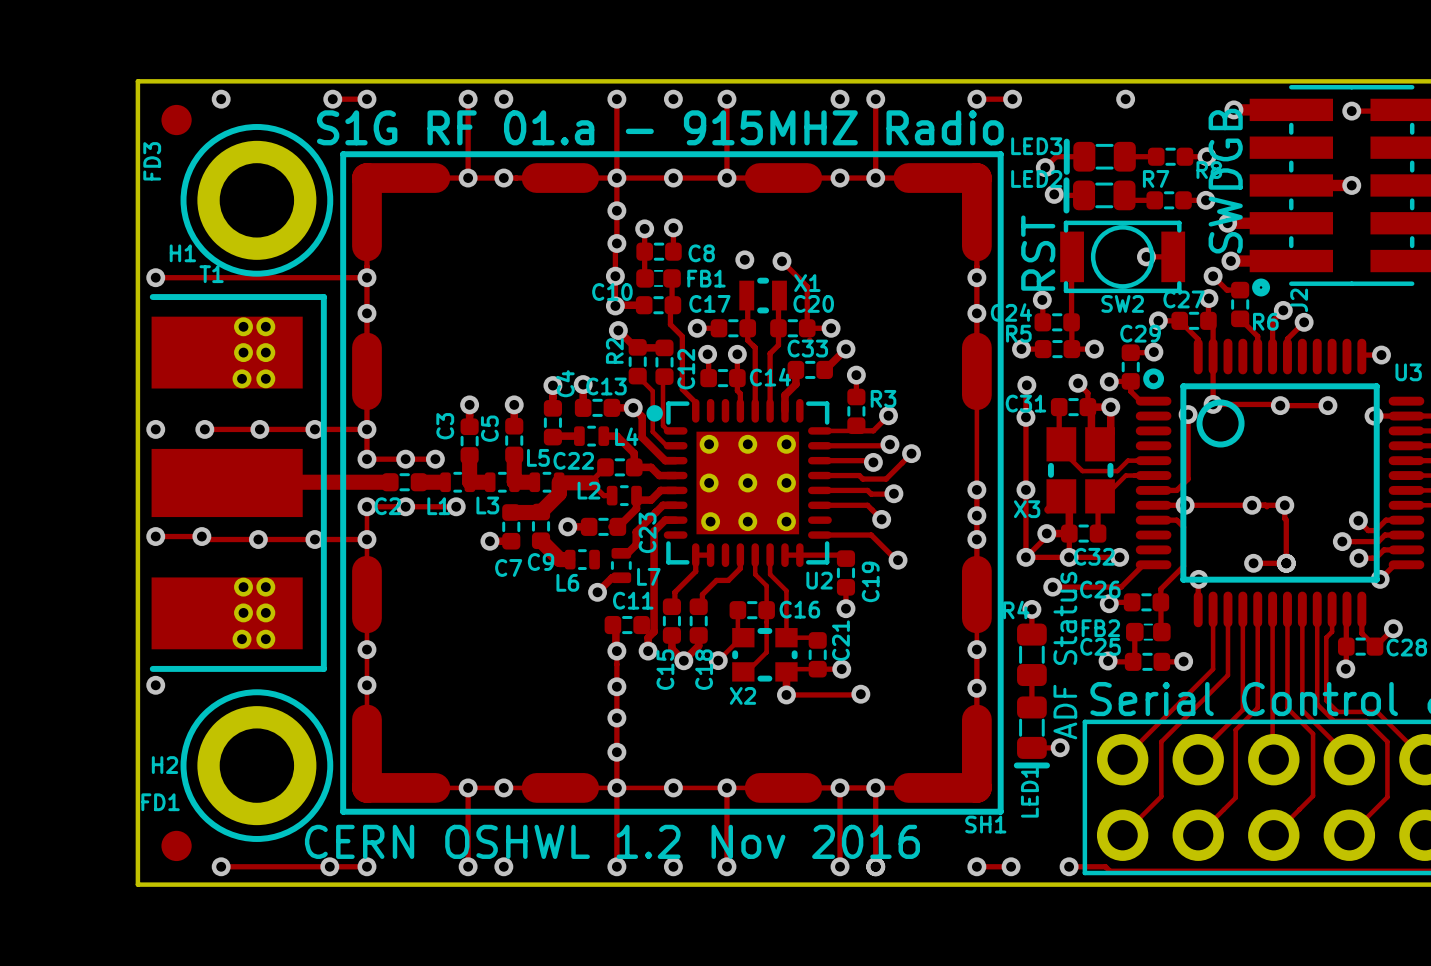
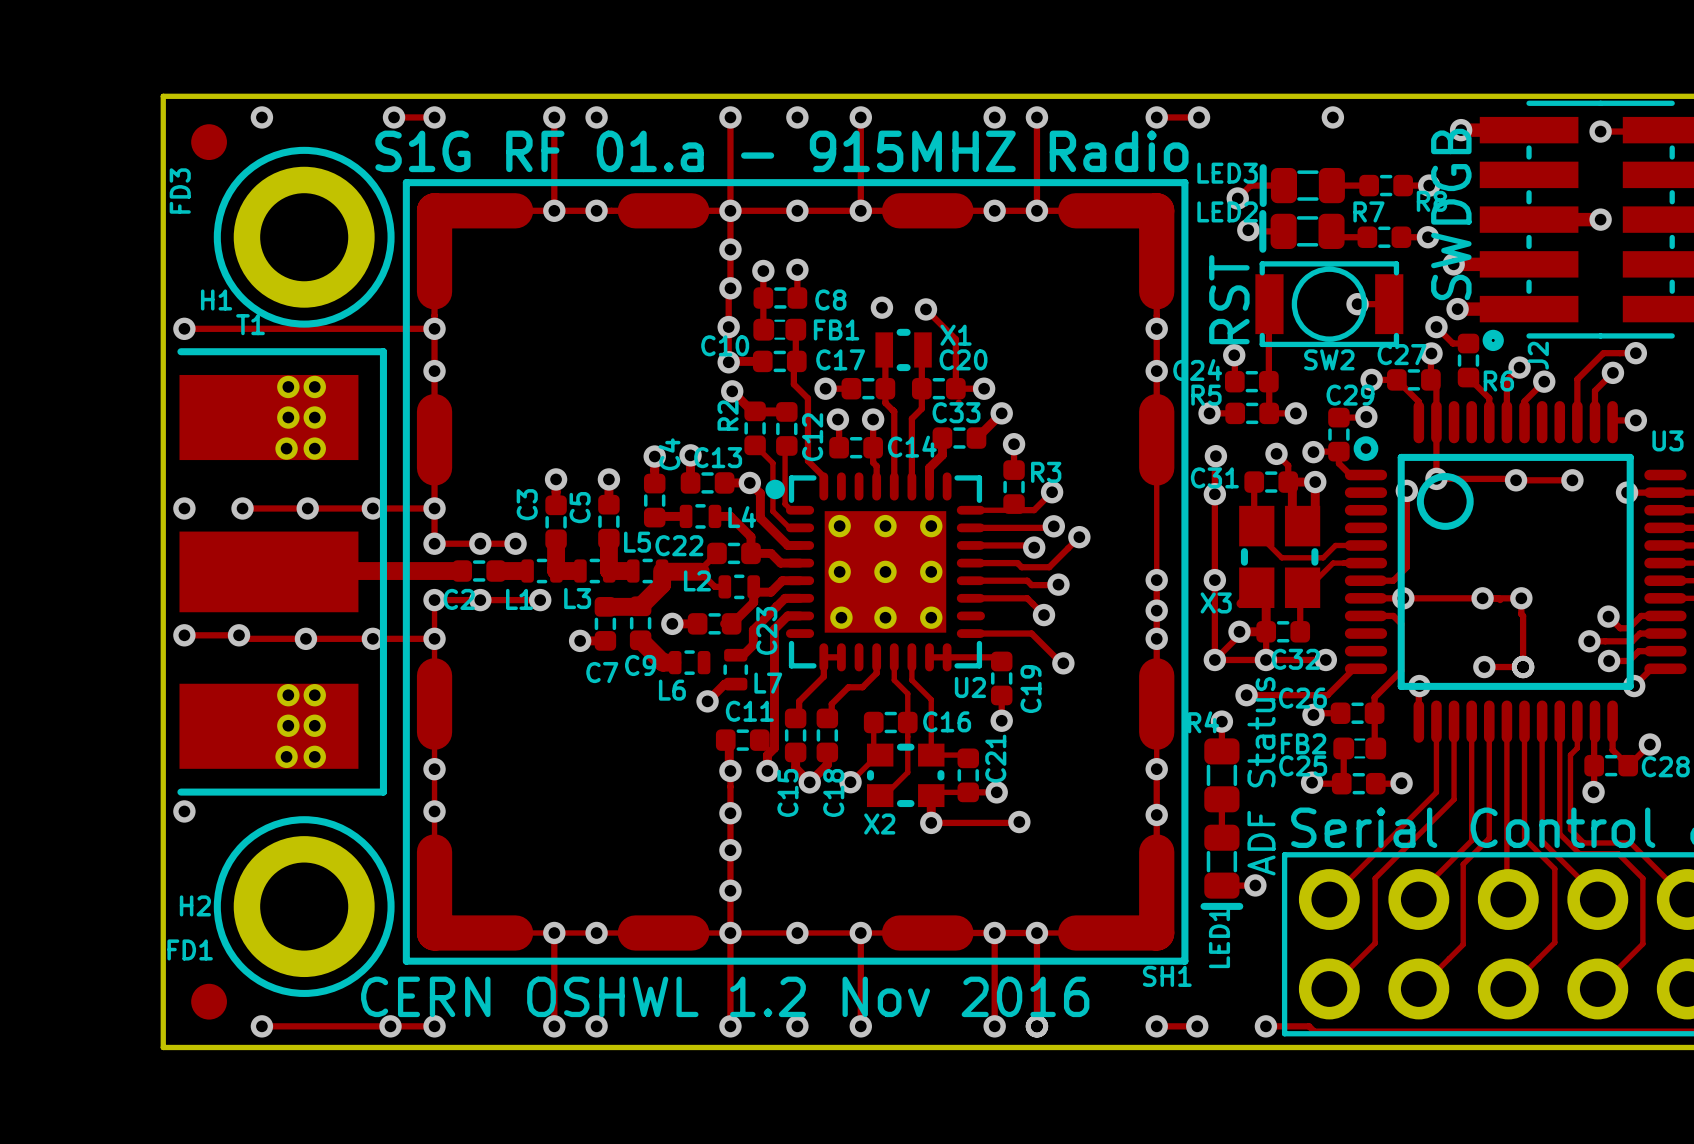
track: none -> (1635, 353) (1603, 353) (1577, 379) (1577, 422)
via: none -> (1635, 353)
track: none -> (1612, 372) (1594, 390) (1594, 422)
via: none -> (1612, 372)

